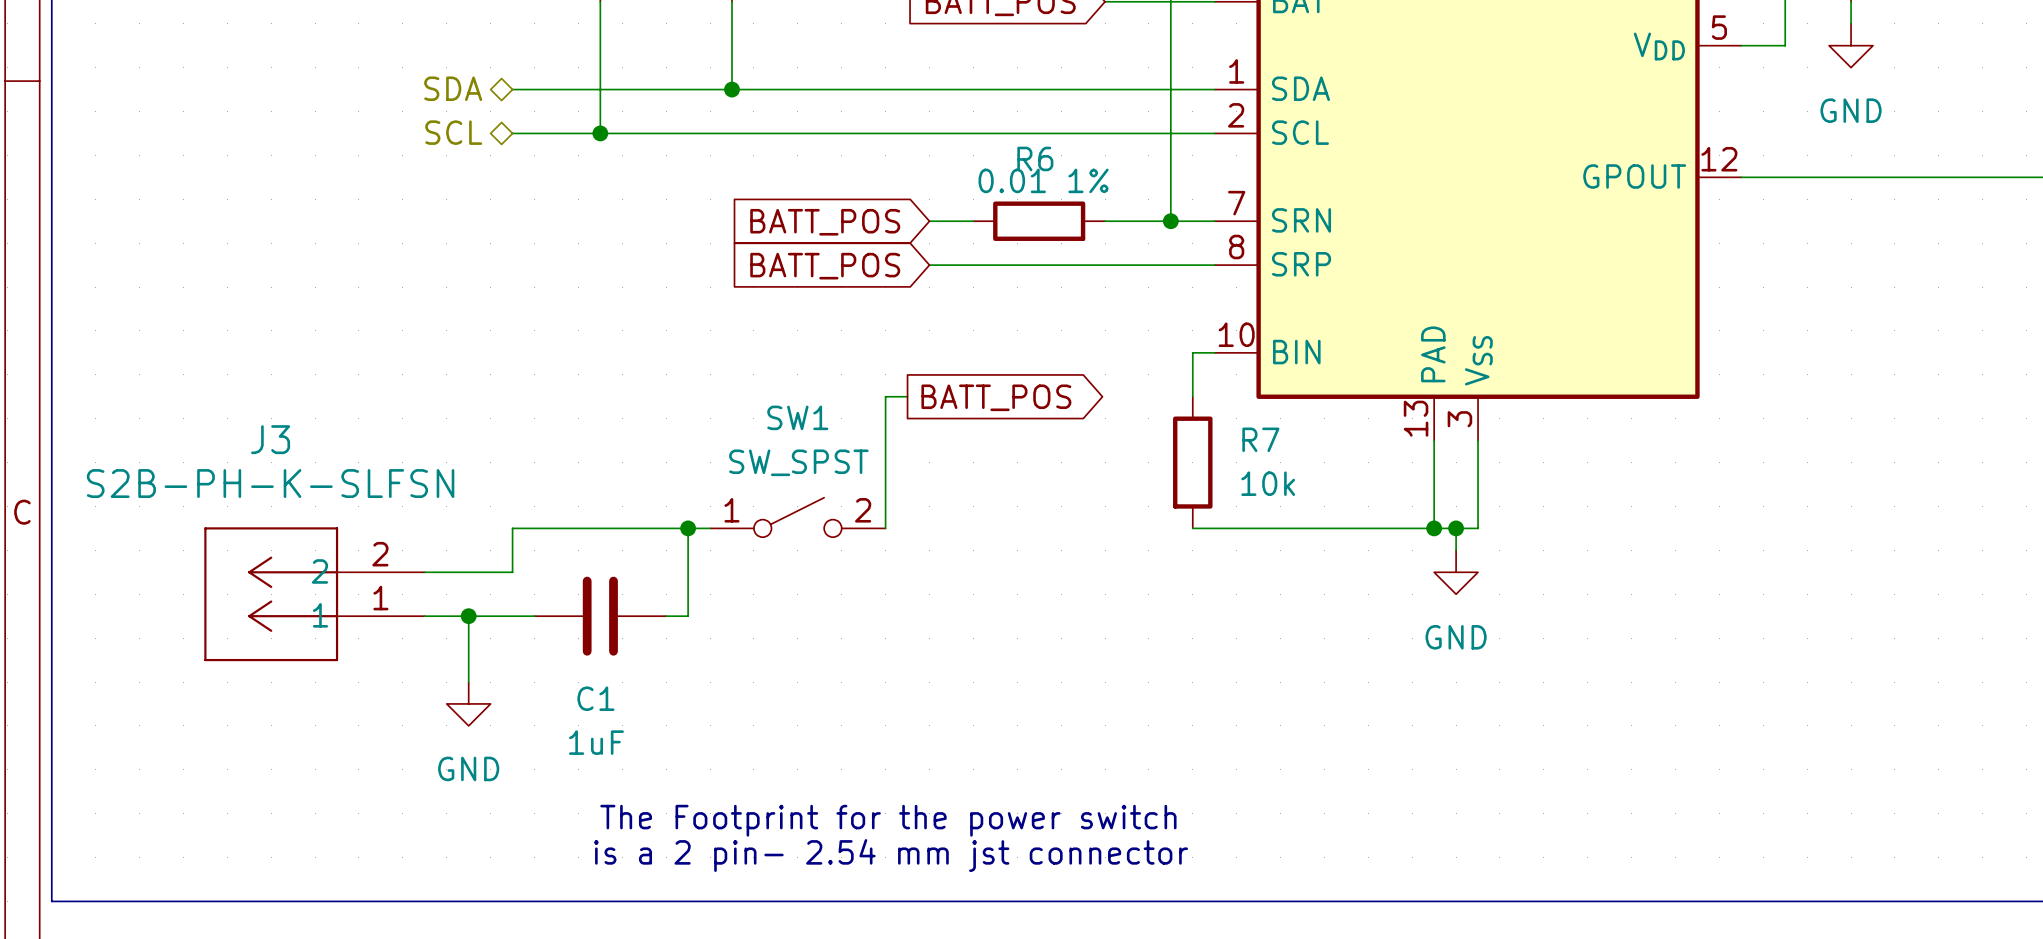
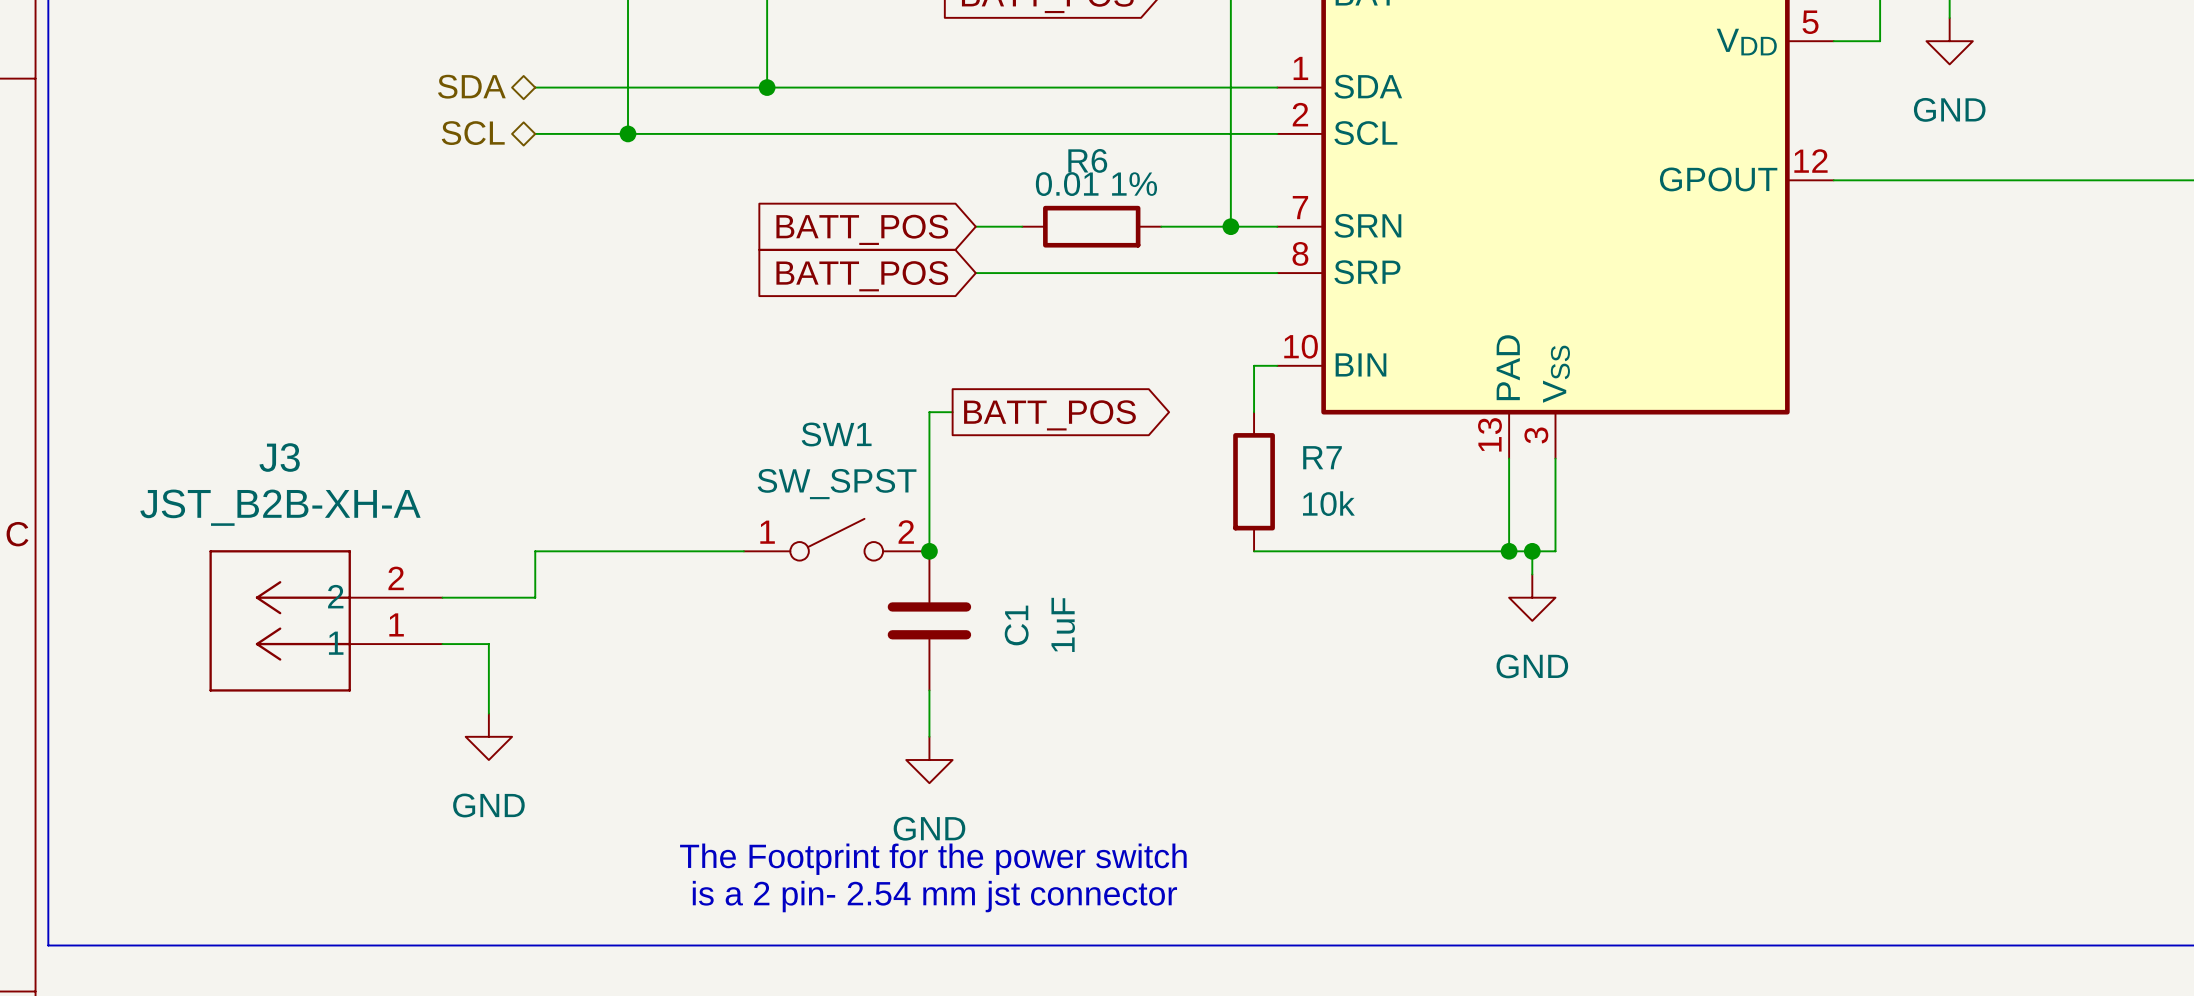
J3 value: S2B-PH-K-SLFSN (270, 483) -> JST_B2B-XH-A (280, 507)
wire: (688, 528) (688, 616) (666, 616) -> none
junction: (688, 528) -> none
junction: none -> (929, 551)
wire: (468, 616) (534, 616) -> none
junction: (468, 616) -> none
C1 rotation: 0° (600, 616) -> 90° clockwise (929, 620)
C1 position: (600, 616) -> (929, 620)
wire: none -> (929, 690) (929, 736)
C1 name position: C1 (595, 698) -> C1 (1016, 625)
power symbol: none -> GND (929, 760)
C1 value position: 1uF (596, 742) -> 1uF (1063, 624)

